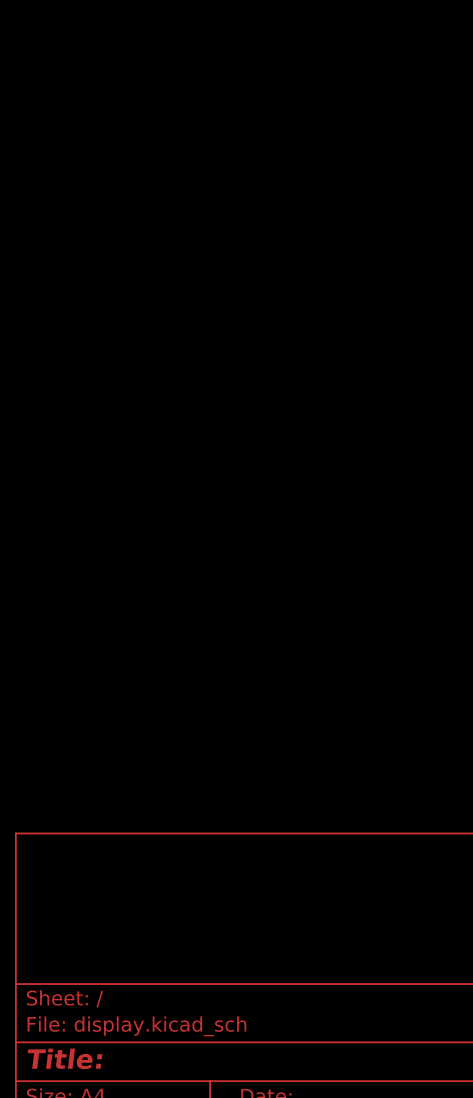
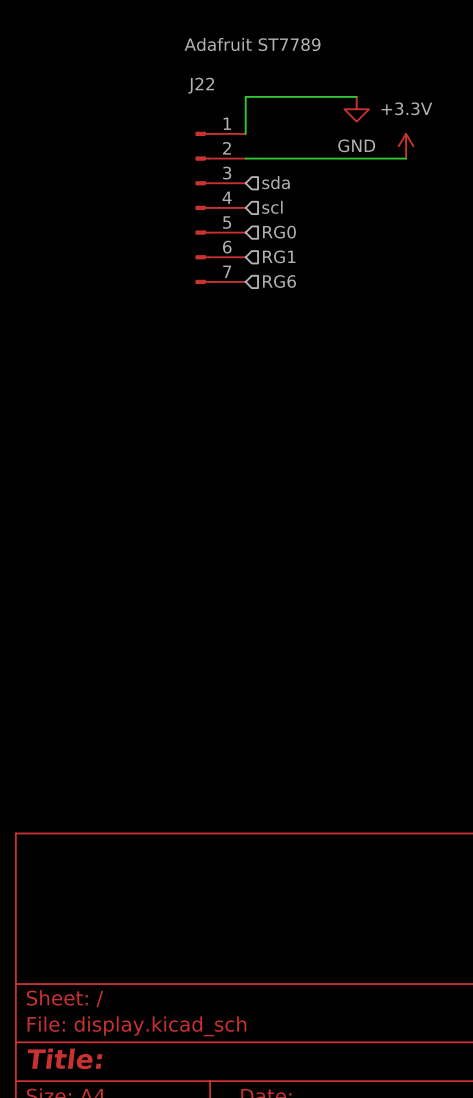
wire: none -> (356, 96) (245, 96) (245, 133)
power symbol: none -> GND (356, 109)
power symbol: none -> +3.3V (406, 146)
wire: none -> (245, 158) (406, 158)
hierarchical label: none -> sda (276, 182)
J22: none -> Adafruit ST7789 (220, 207)
hierarchical label: none -> scl (272, 207)
hierarchical label: none -> RG0 (279, 232)
hierarchical label: none -> RG1 (279, 256)
hierarchical label: none -> RG6 (279, 281)

